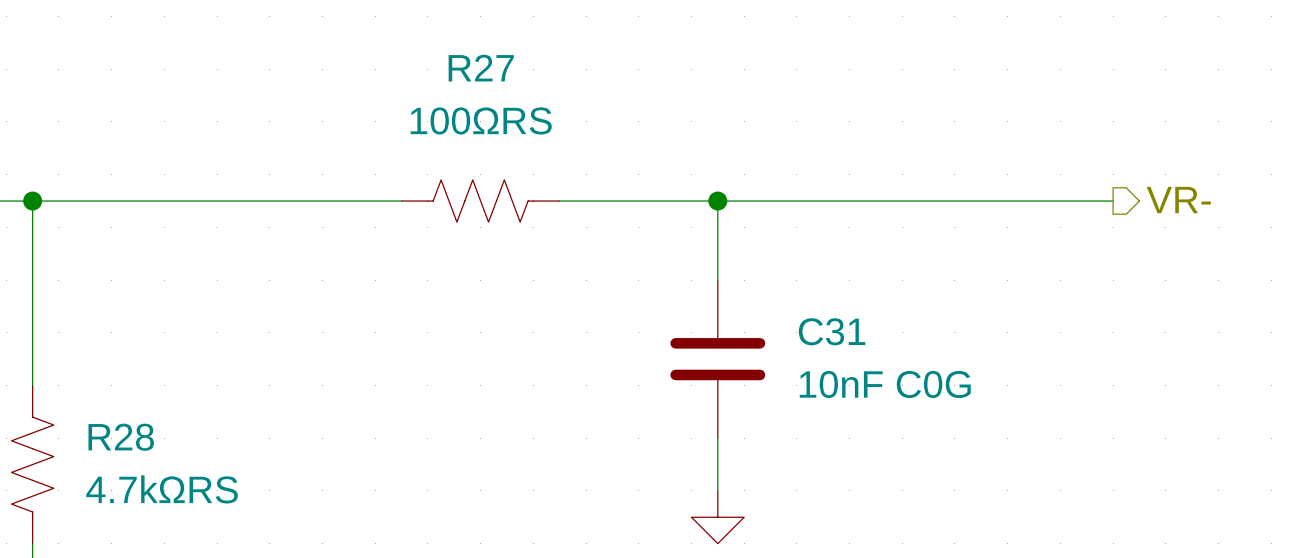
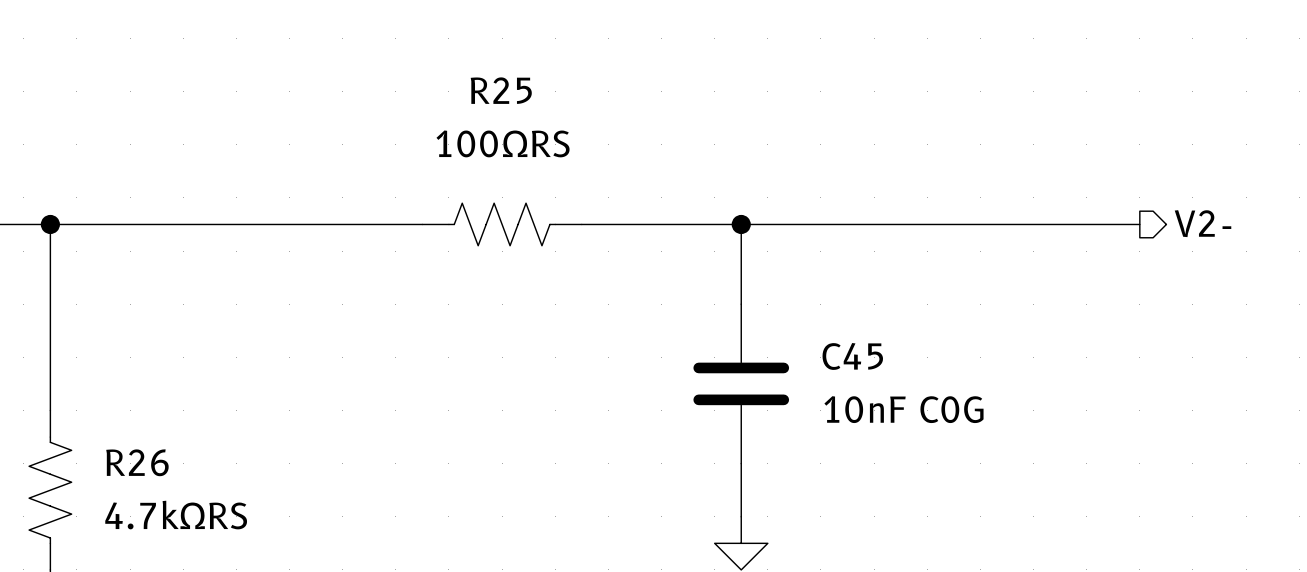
R27 name: R27 (481, 68) -> R25 (501, 90)
hierarchical label: VR- (1178, 200) -> V2- (1203, 223)
C31 name: C31 (832, 331) -> C45 (852, 356)
R28 name: R28 (121, 437) -> R26 (137, 462)

